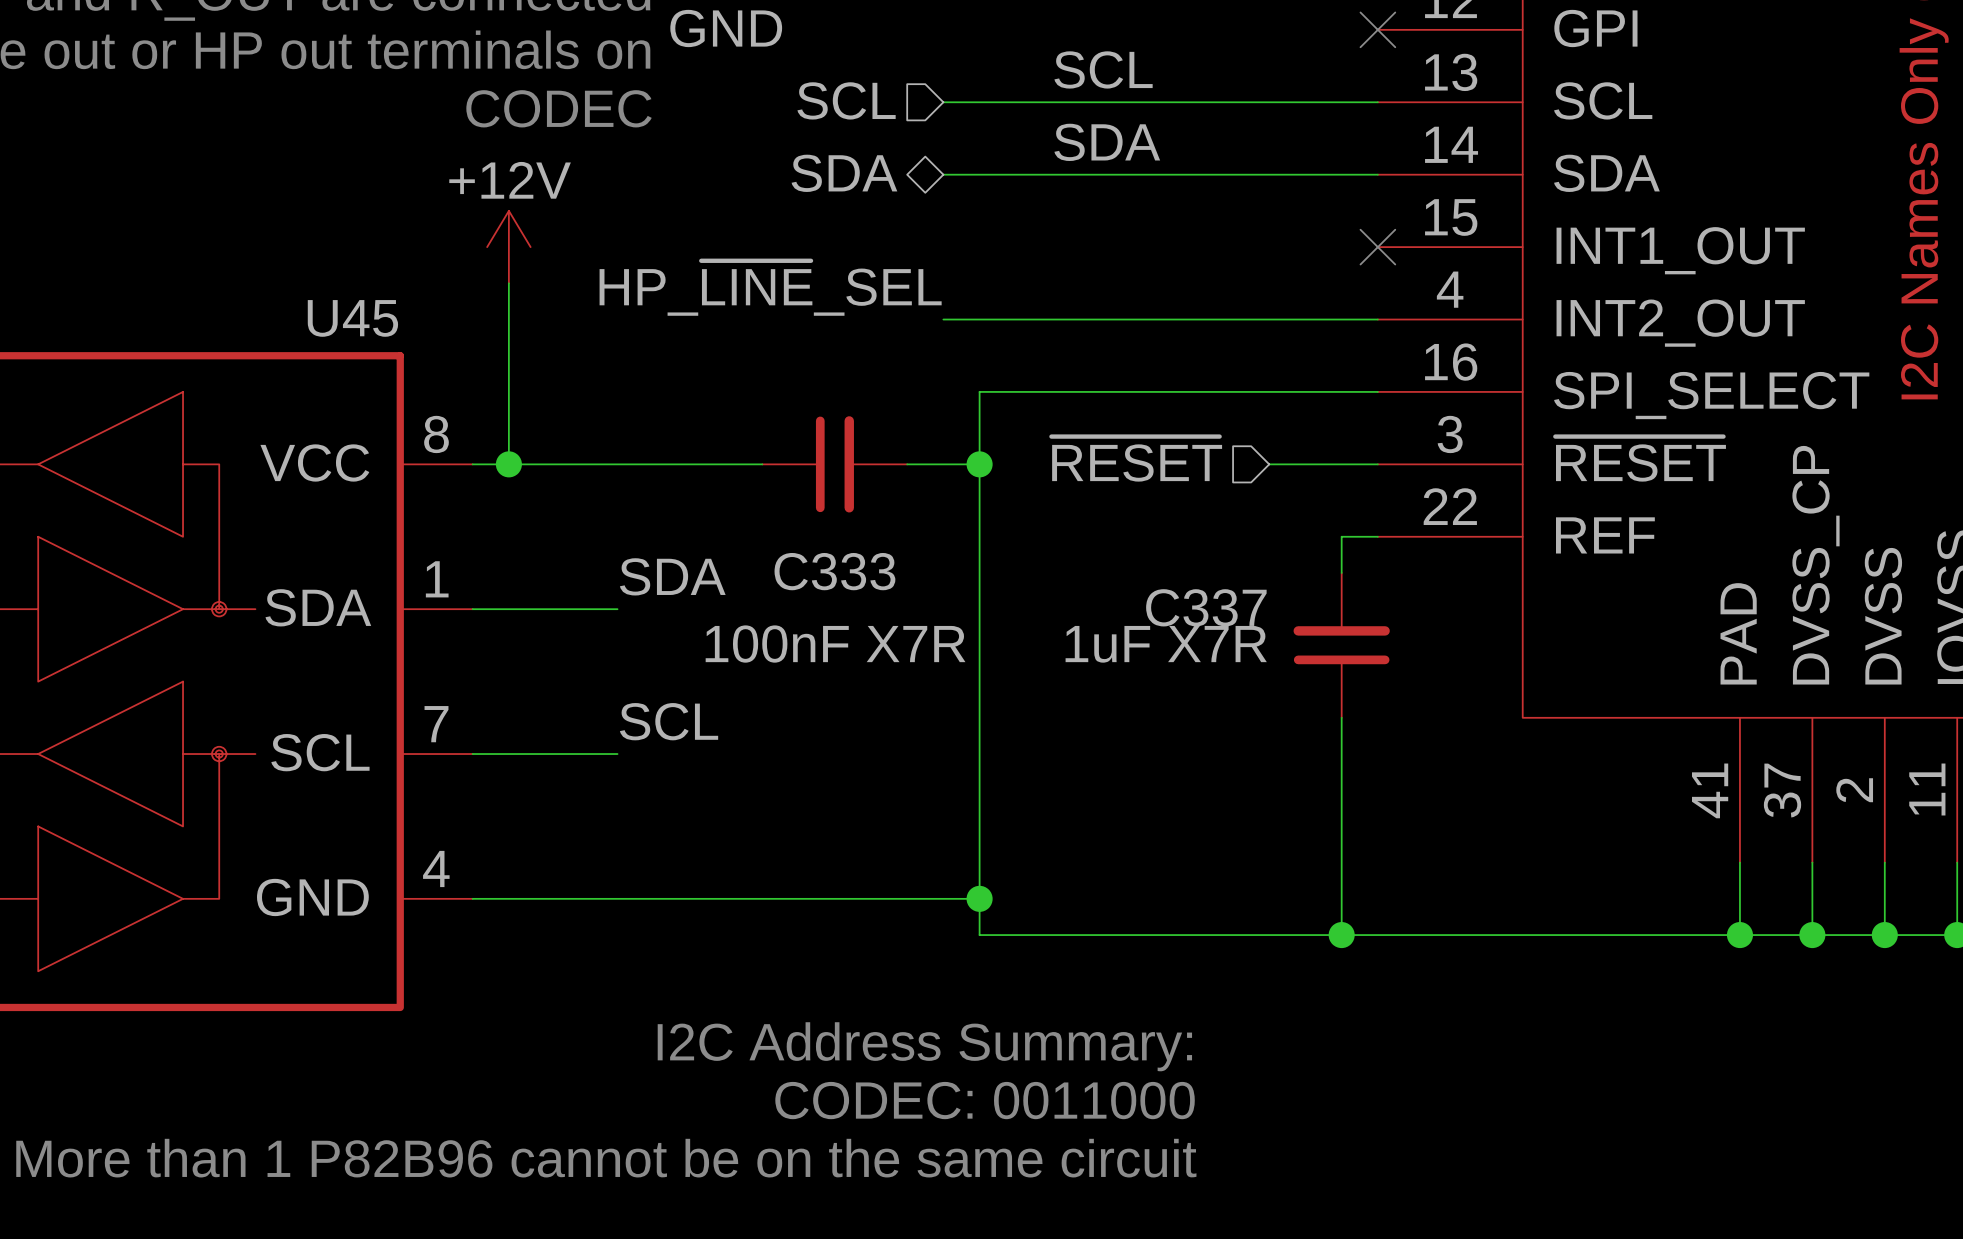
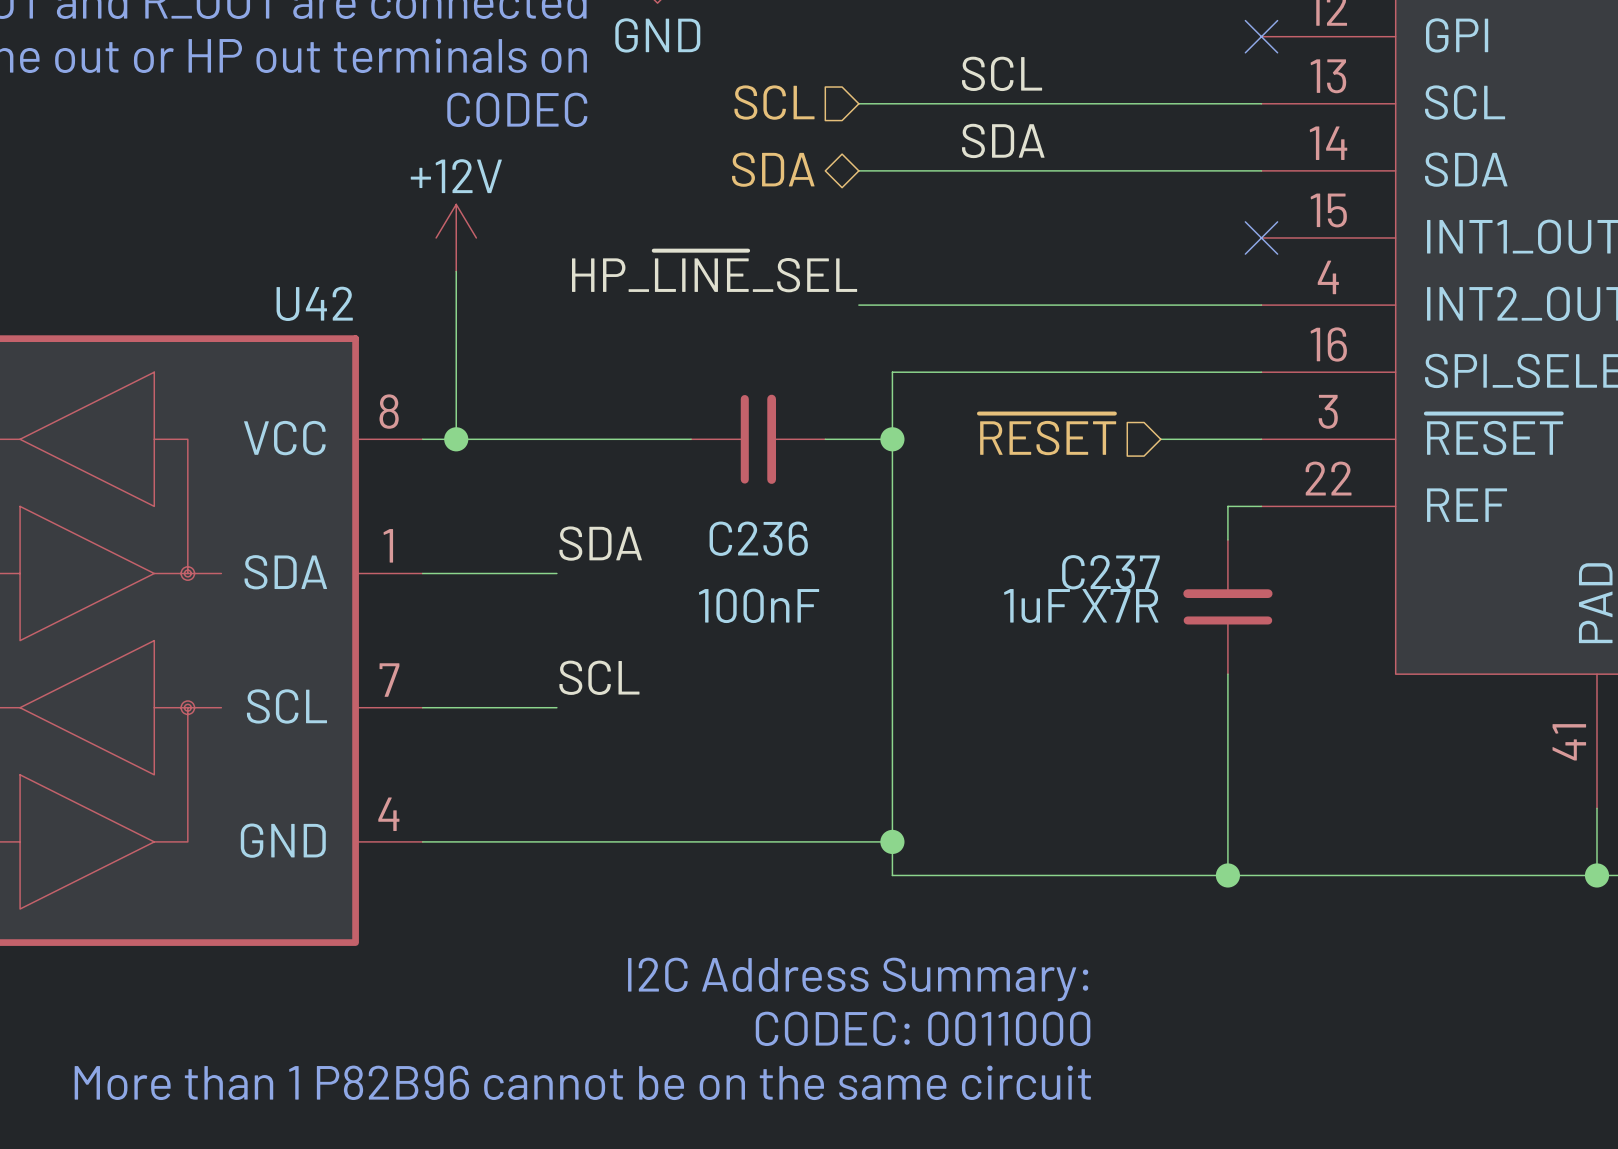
U45 name: U45 (352, 318) -> U42 (314, 303)
C333 name: C333 (834, 571) -> C236 (758, 538)
C337 name: C337 (1206, 607) -> C237 (1110, 572)
C333 value: 100nF X7R (835, 644) -> 100nF (759, 605)

